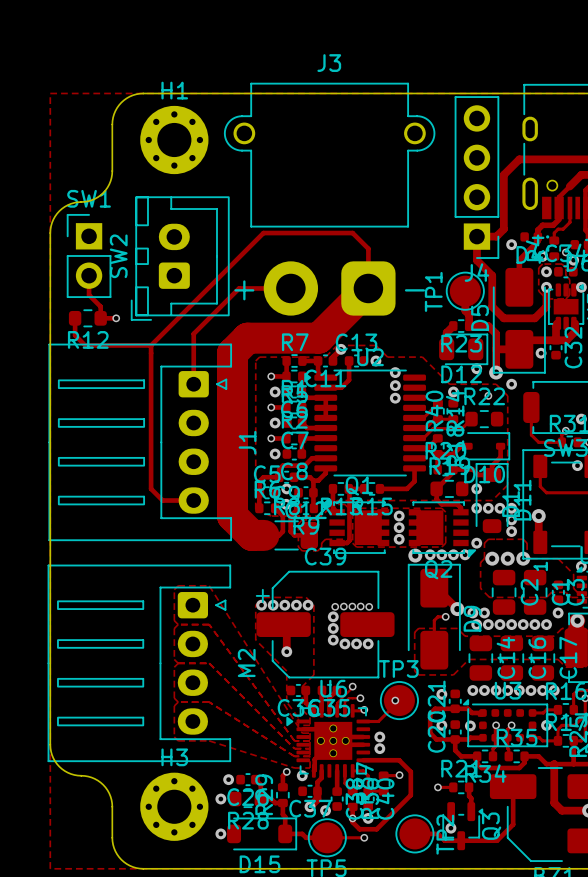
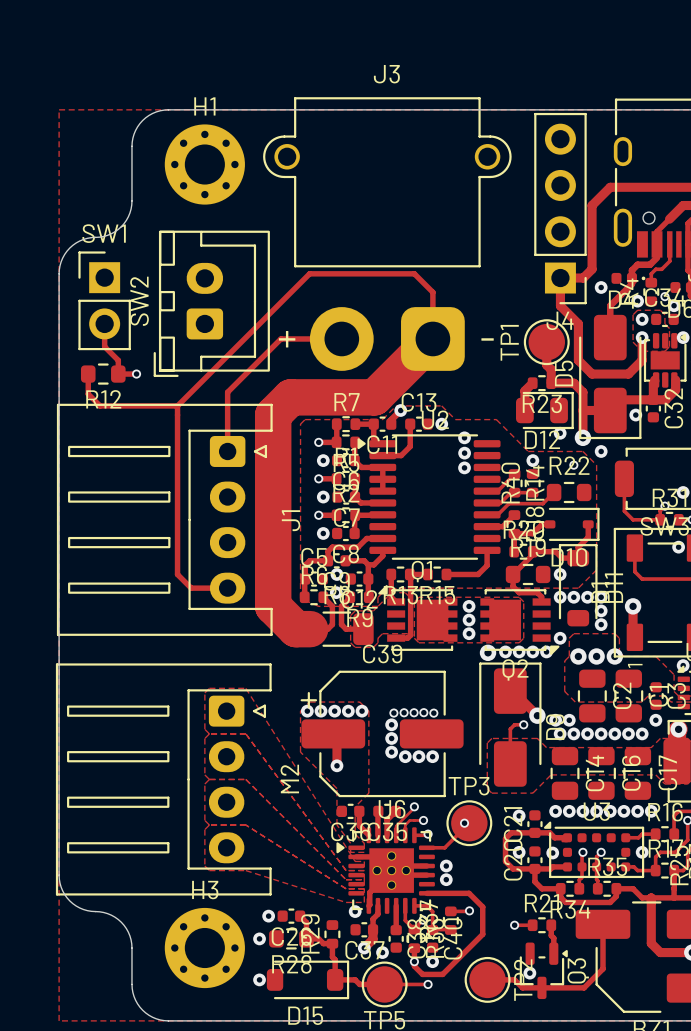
track: (286, 771) (282, 775) (282, 787) -> none
via: (286, 771) -> none

